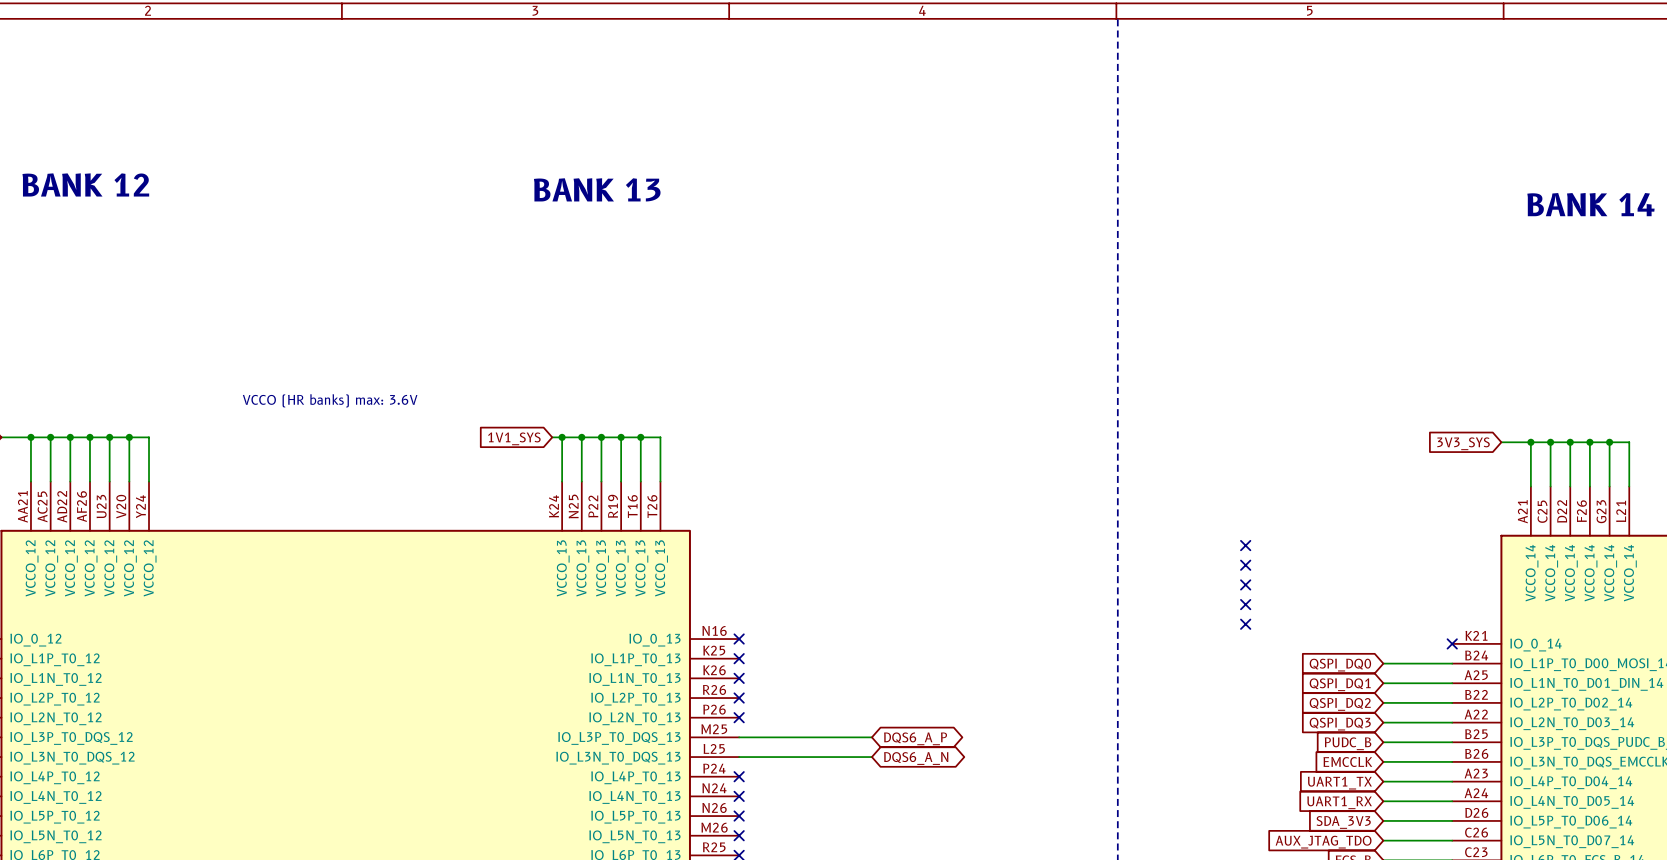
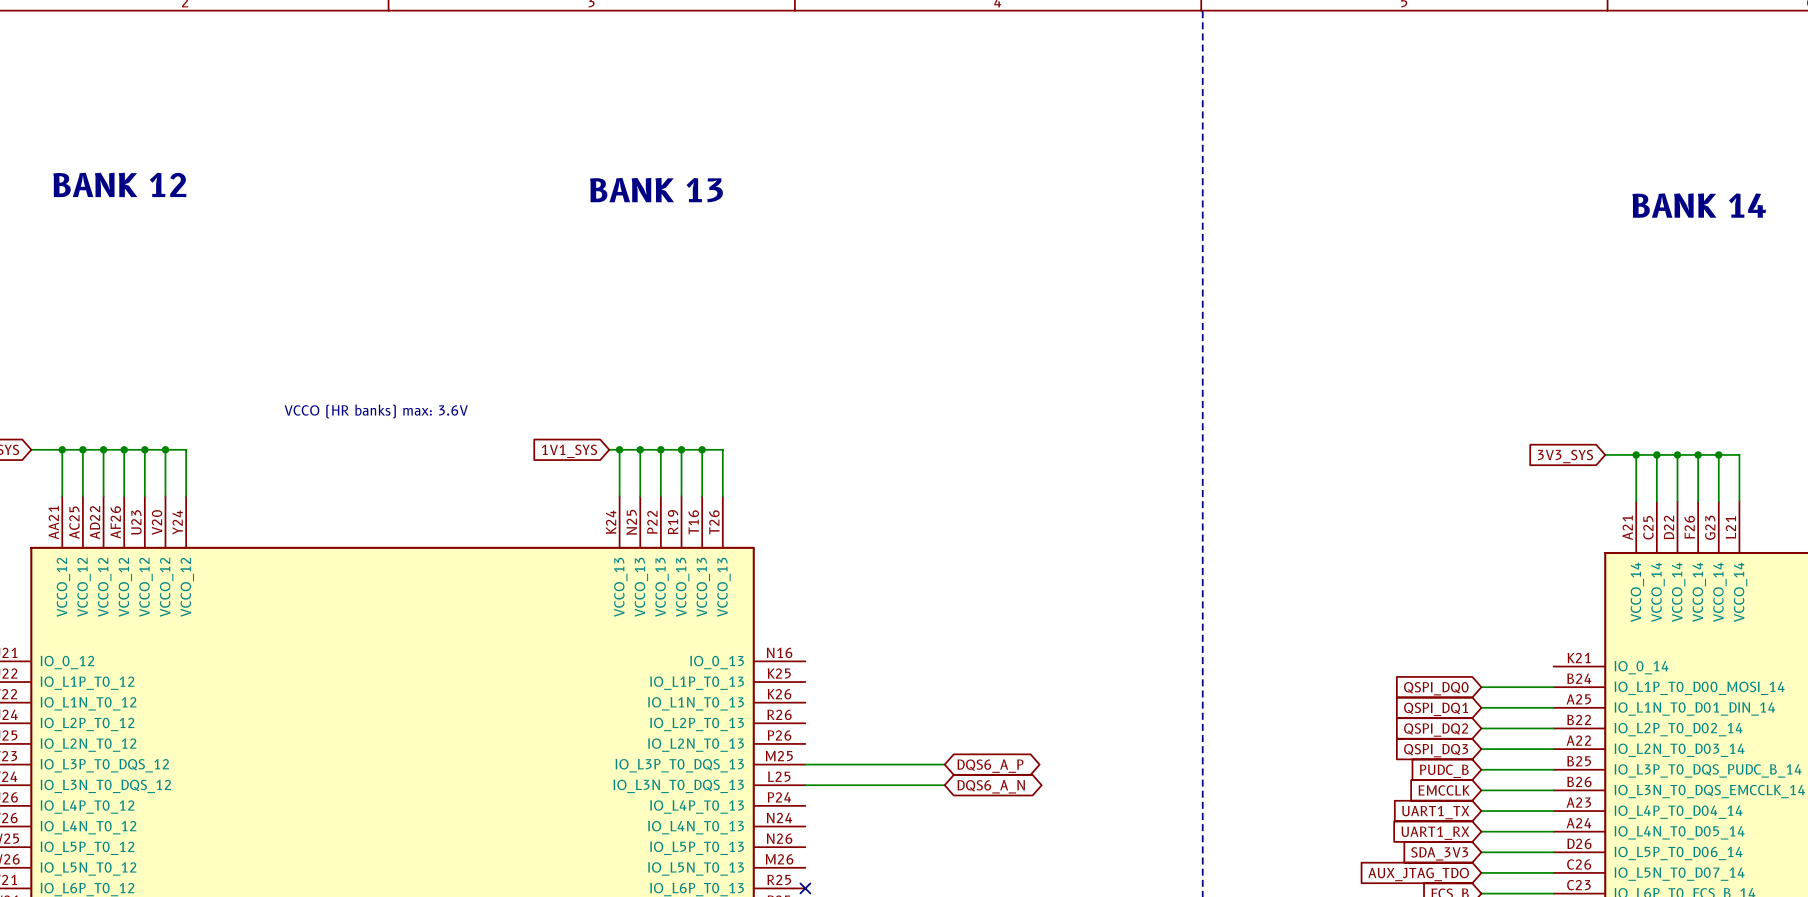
no-connect mark: (1245, 545) -> none
no-connect mark: (1245, 565) -> none
no-connect mark: (1245, 584) -> none
no-connect mark: (1245, 604) -> none
no-connect mark: (1245, 624) -> none
no-connect mark: (739, 639) -> none
no-connect mark: (1452, 643) -> none
no-connect mark: (739, 658) -> none
no-connect mark: (739, 678) -> none
no-connect mark: (739, 698) -> none
no-connect mark: (739, 717) -> none
no-connect mark: (739, 776) -> none
no-connect mark: (739, 796) -> none
no-connect mark: (739, 816) -> none
no-connect mark: (739, 835) -> none

